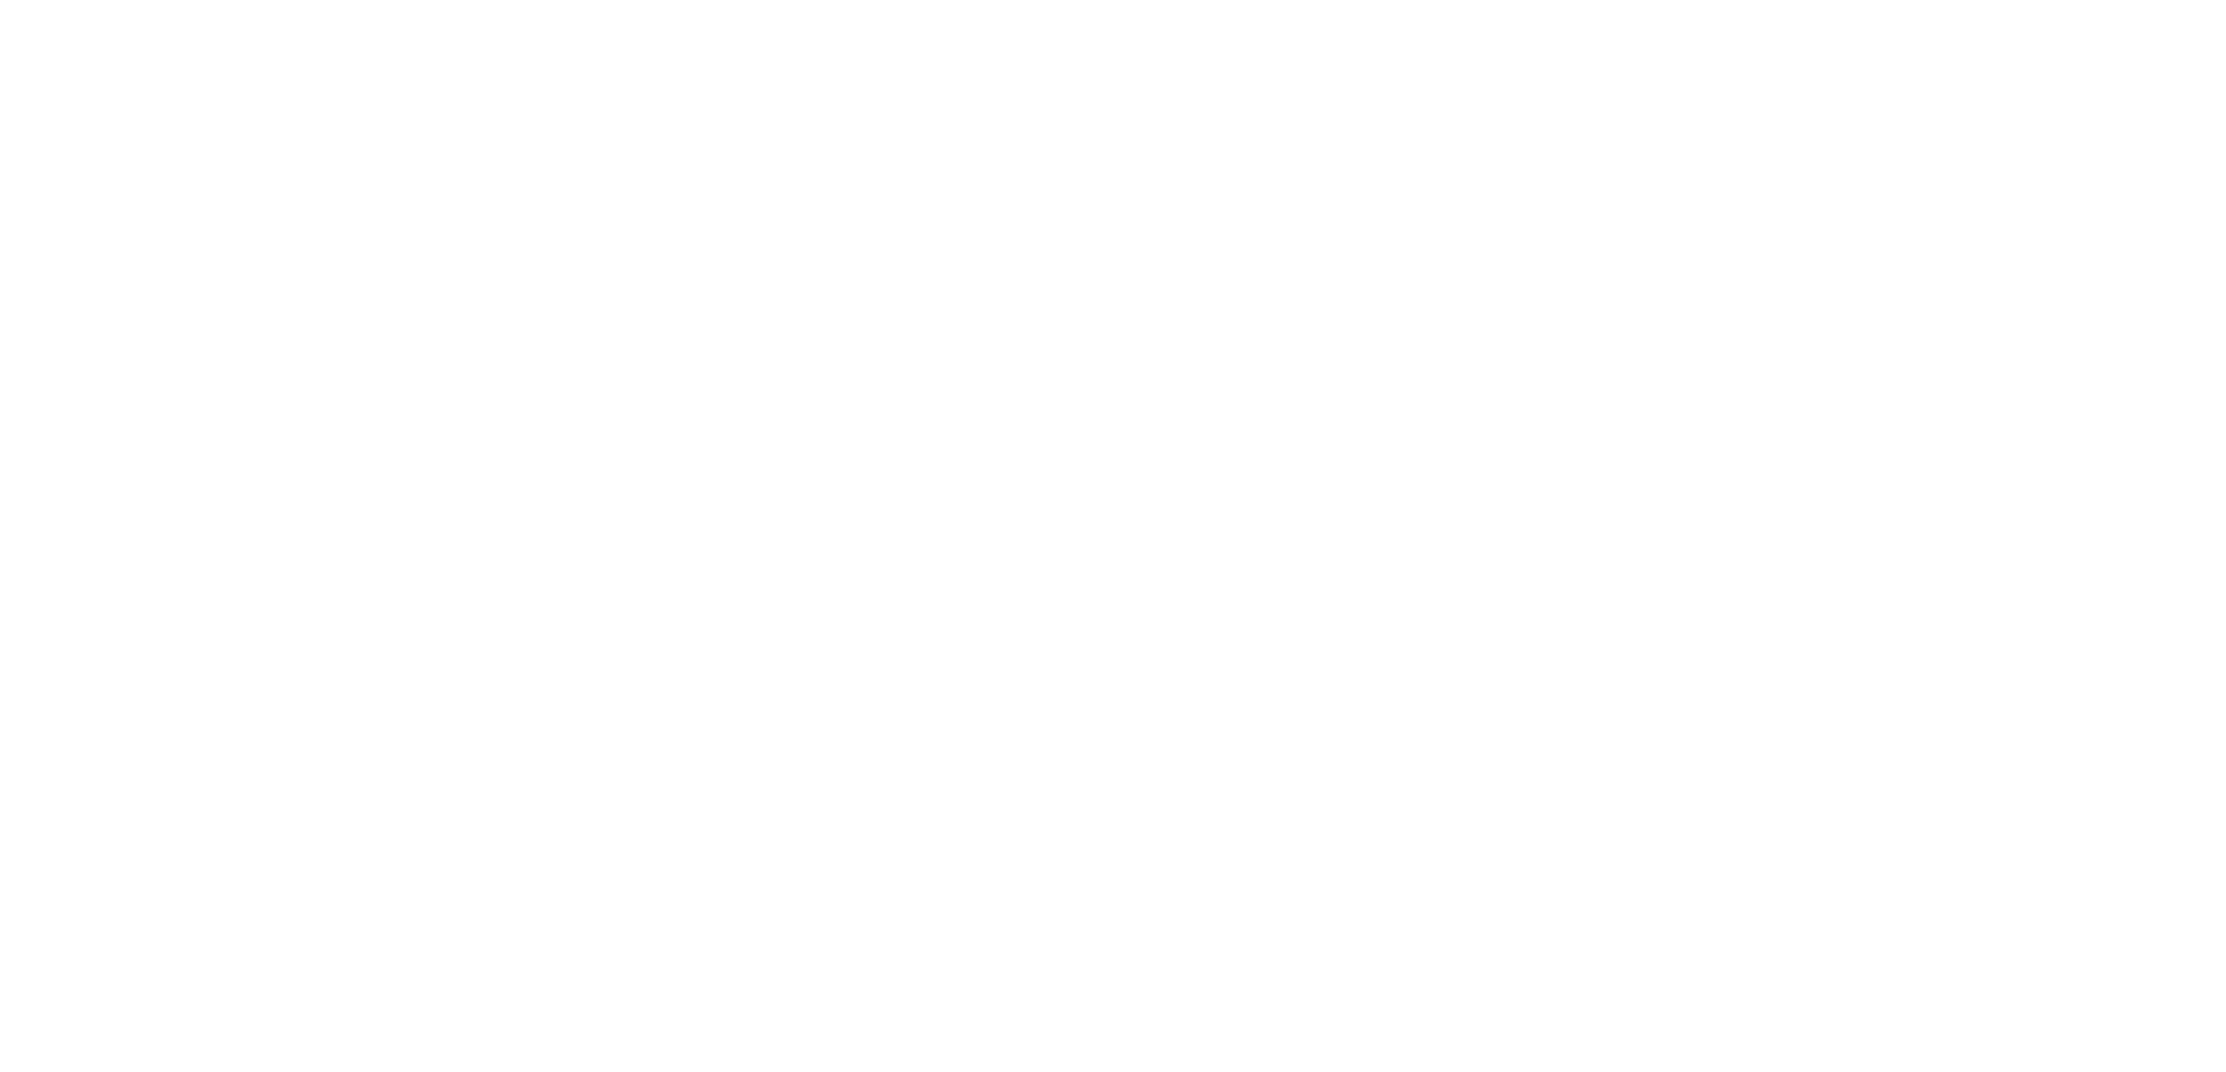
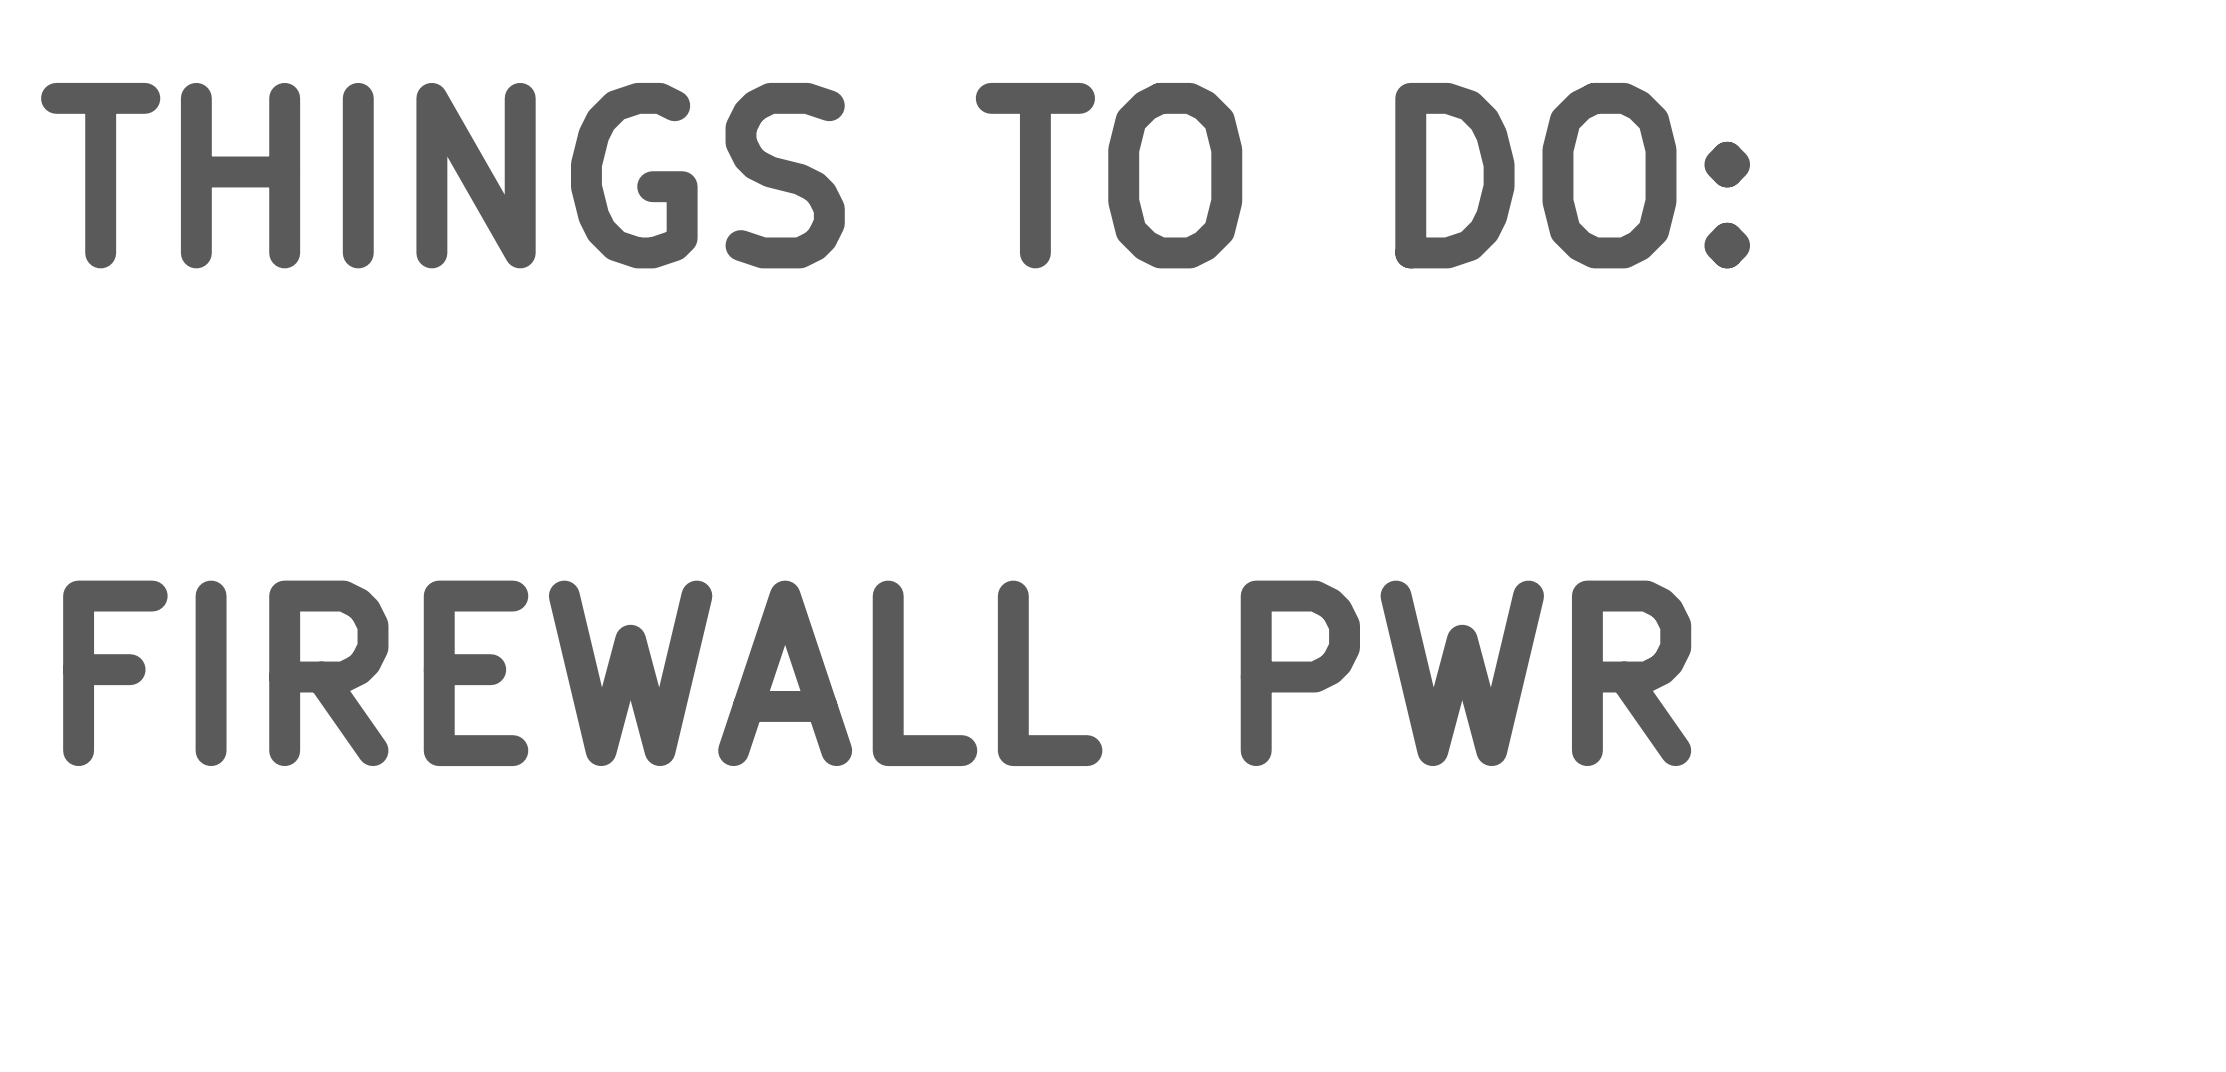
text: none -> THINGS TO DO: (895, 175)
text: none -> FIREWALL PWR (877, 673)

